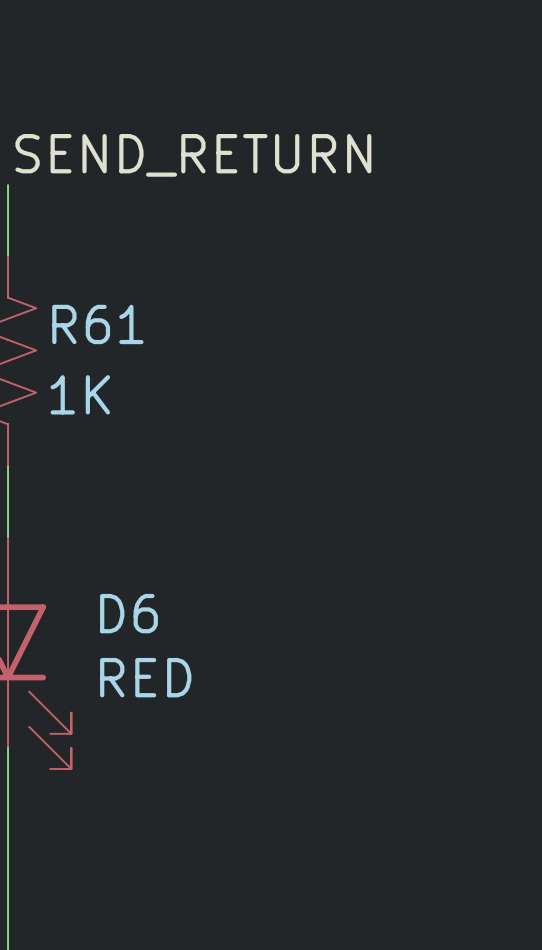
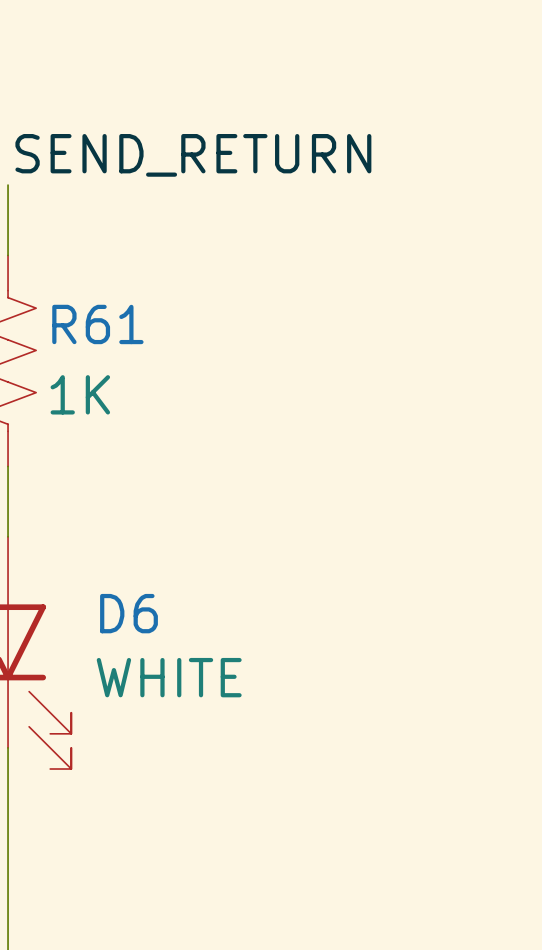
D6 value: RED (145, 677) -> WHITE (169, 677)

